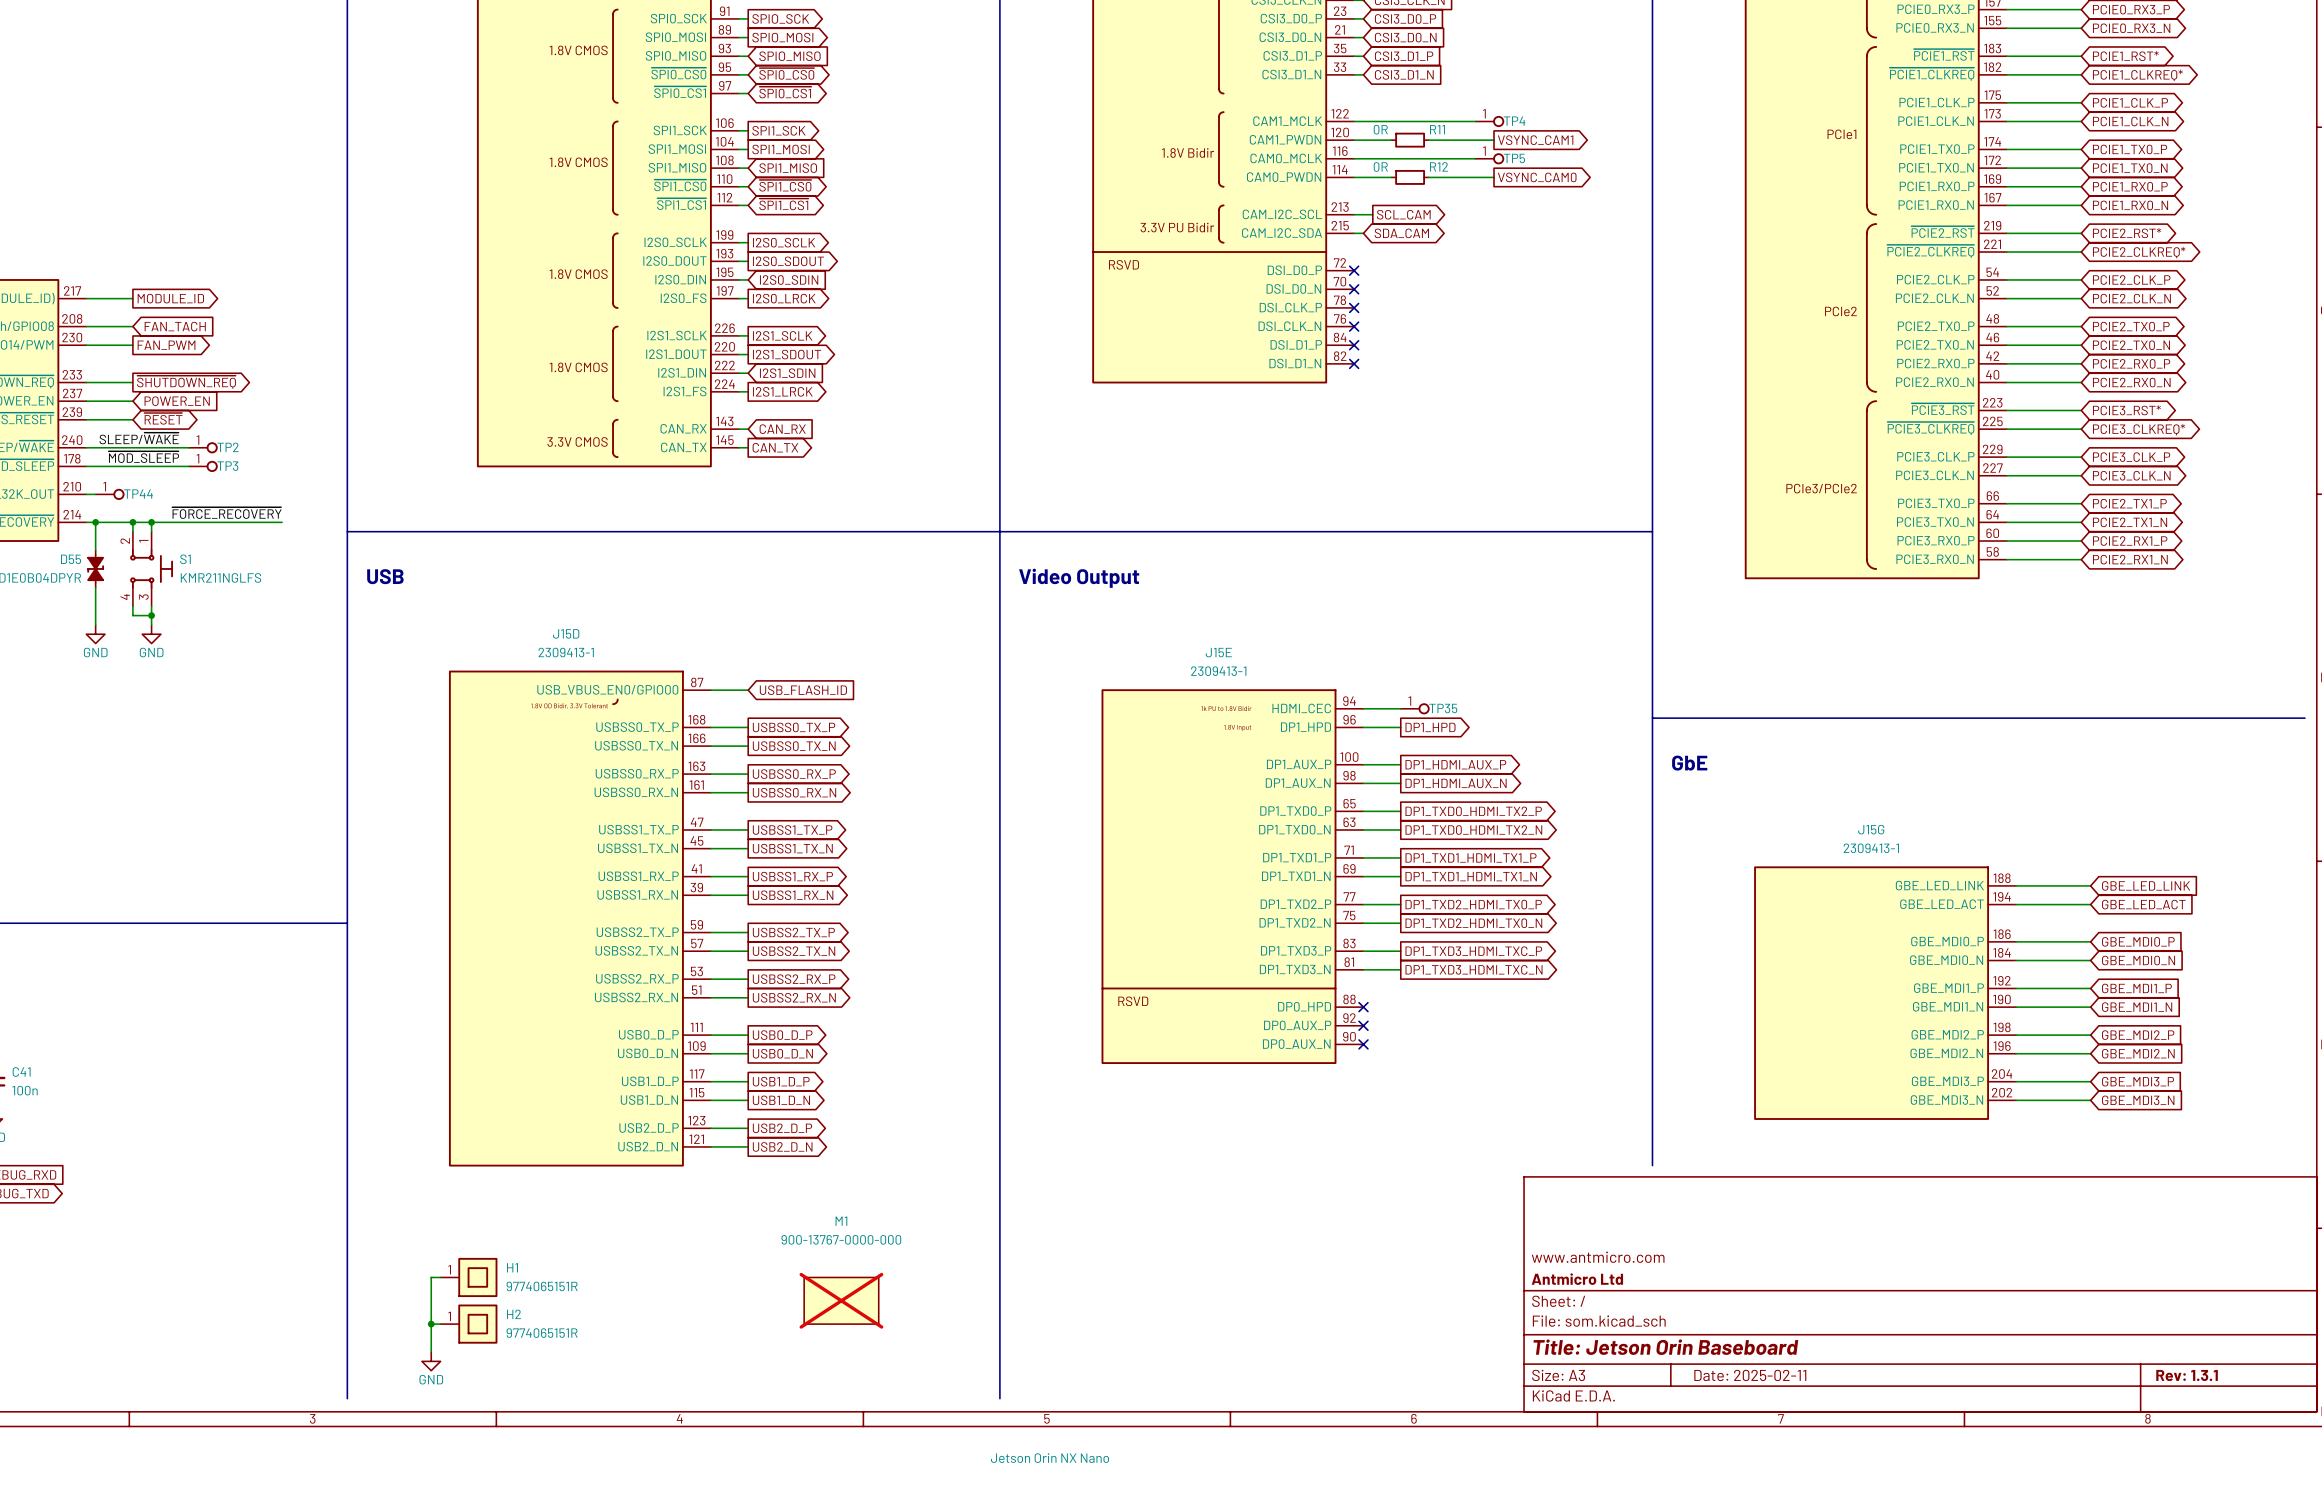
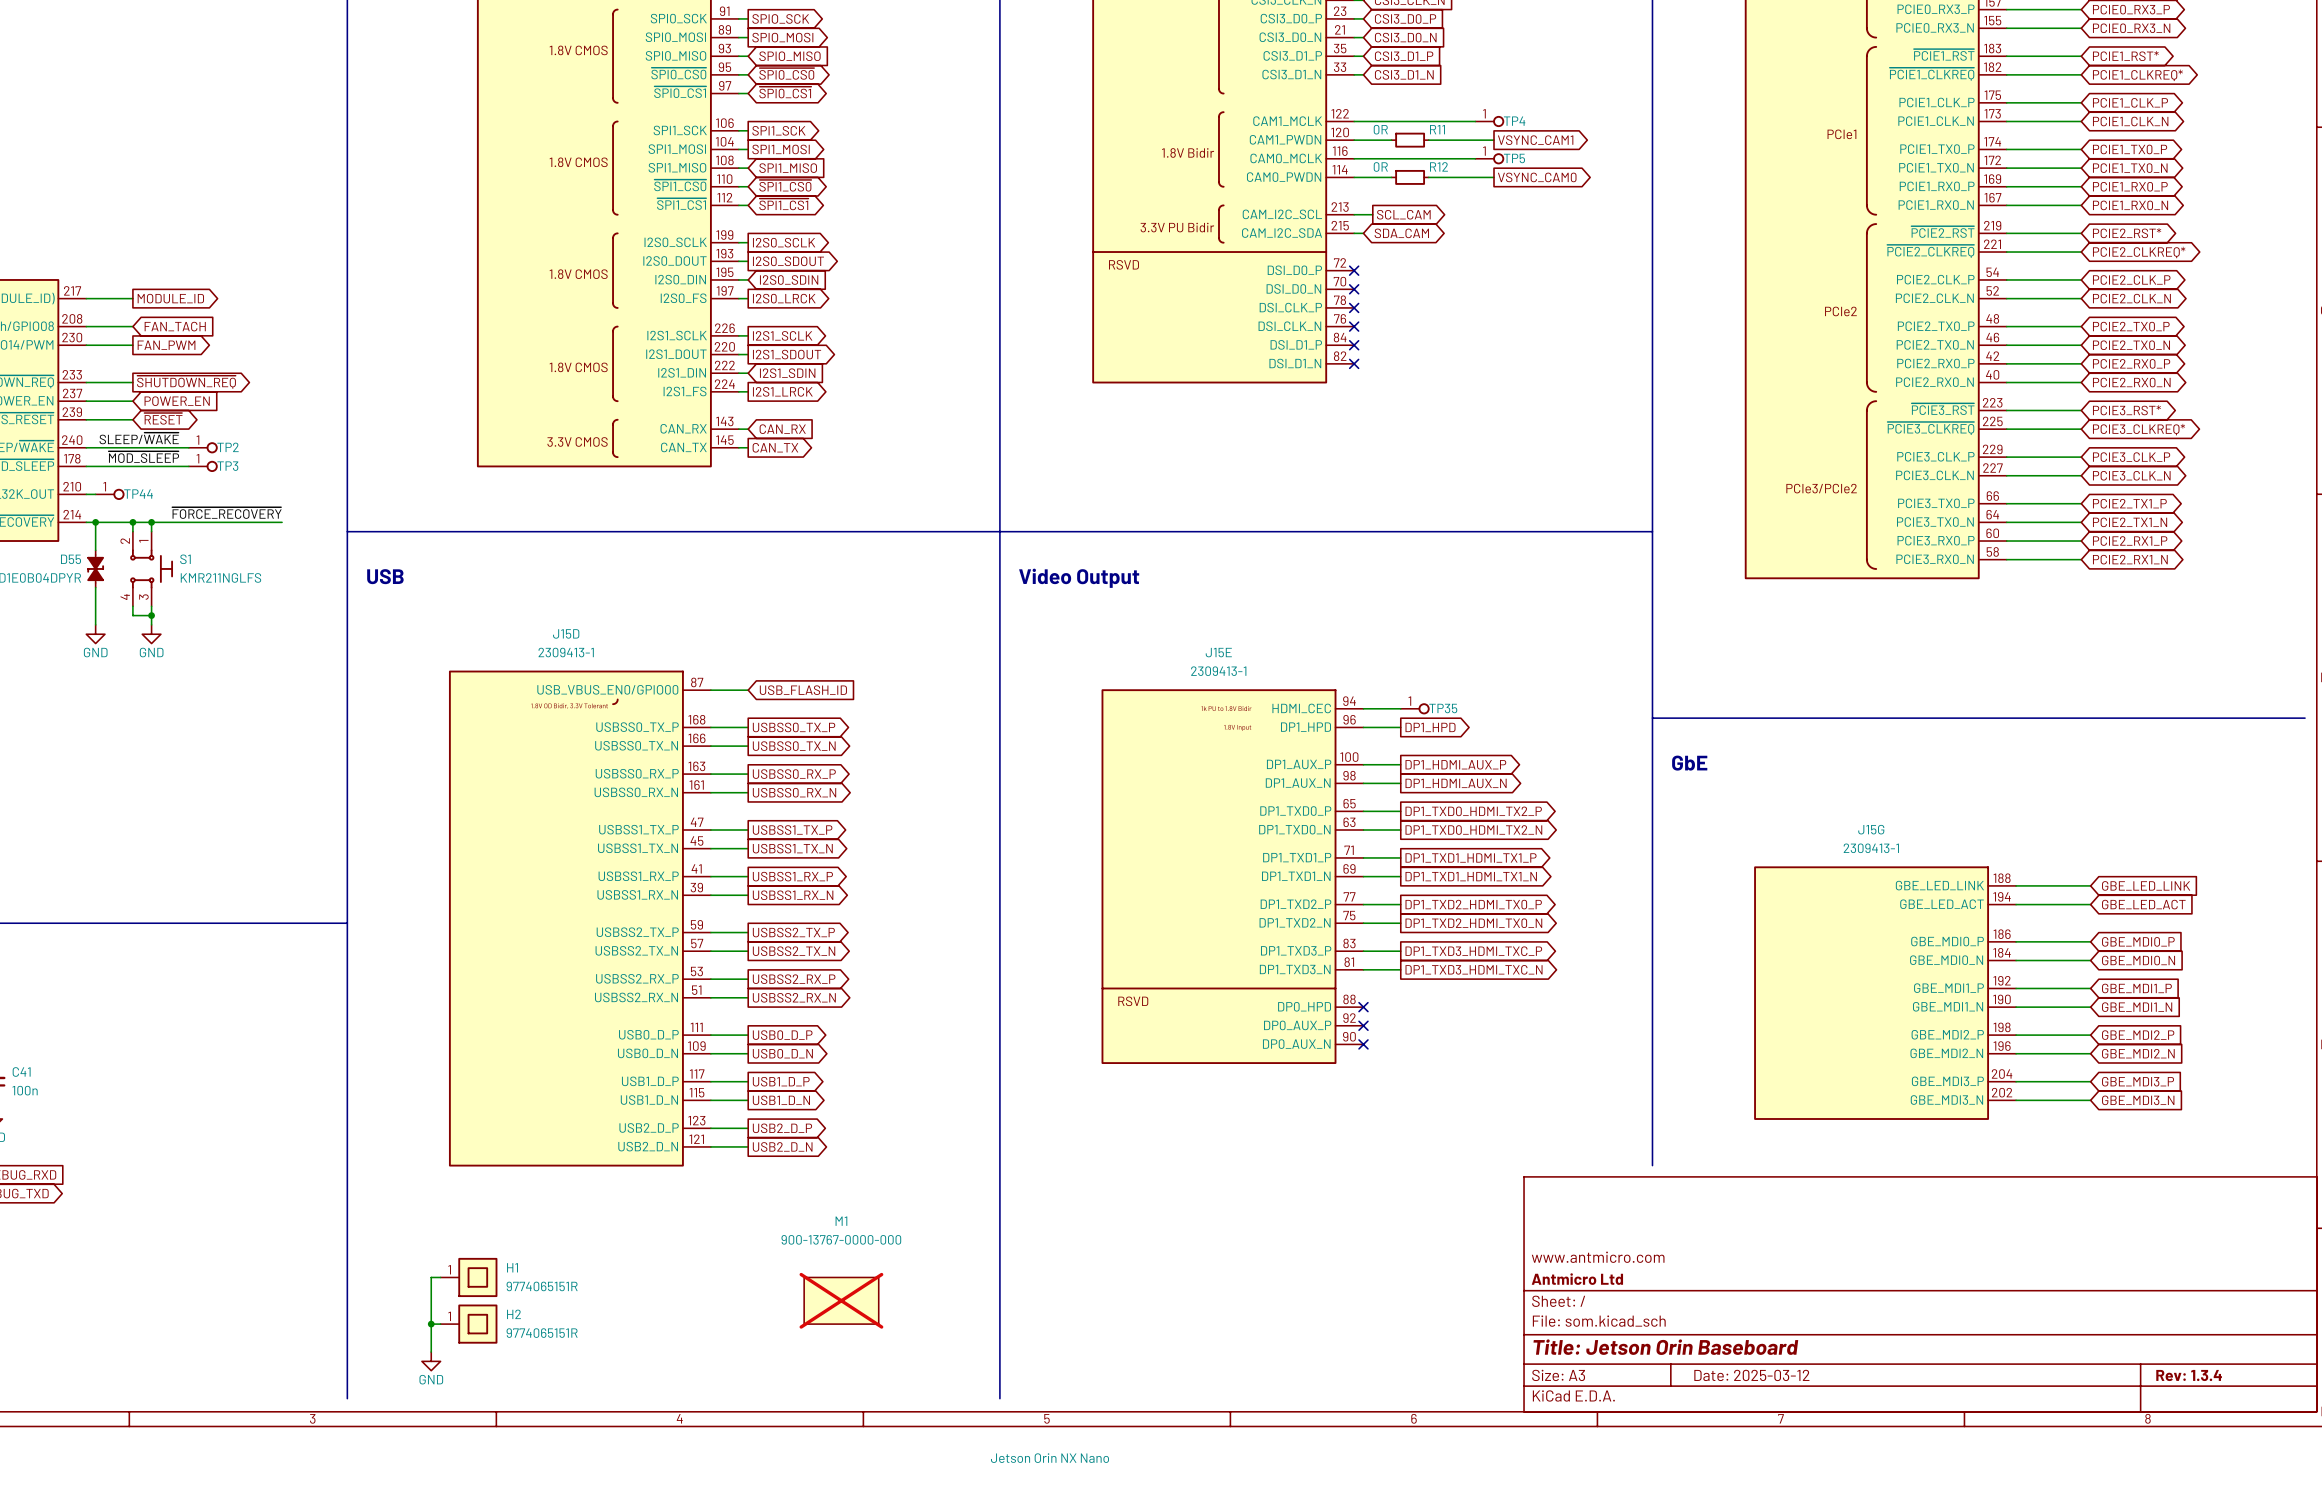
title block: Date: 2025-02-11 (1750, 1375) -> Date: 2025-03-12 (1751, 1375)
title block: Rev: 1.3.1 (2187, 1375) -> Rev: 1.3.4 (2189, 1375)

